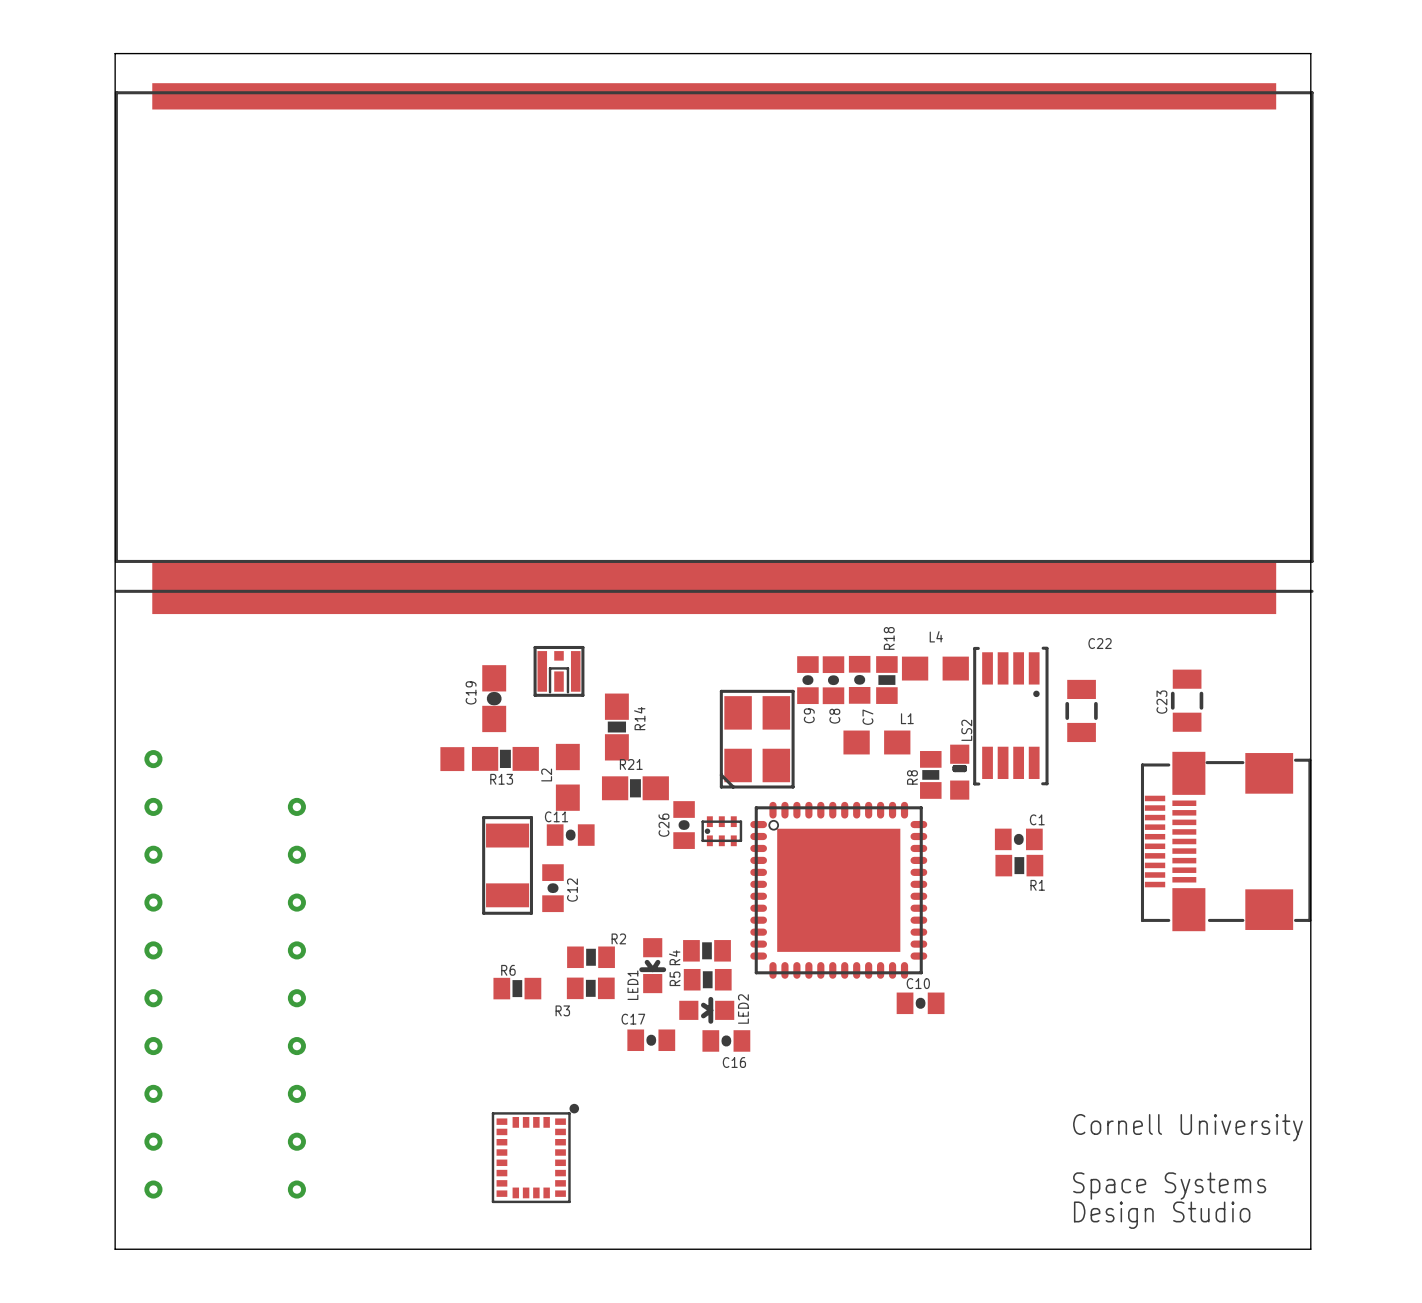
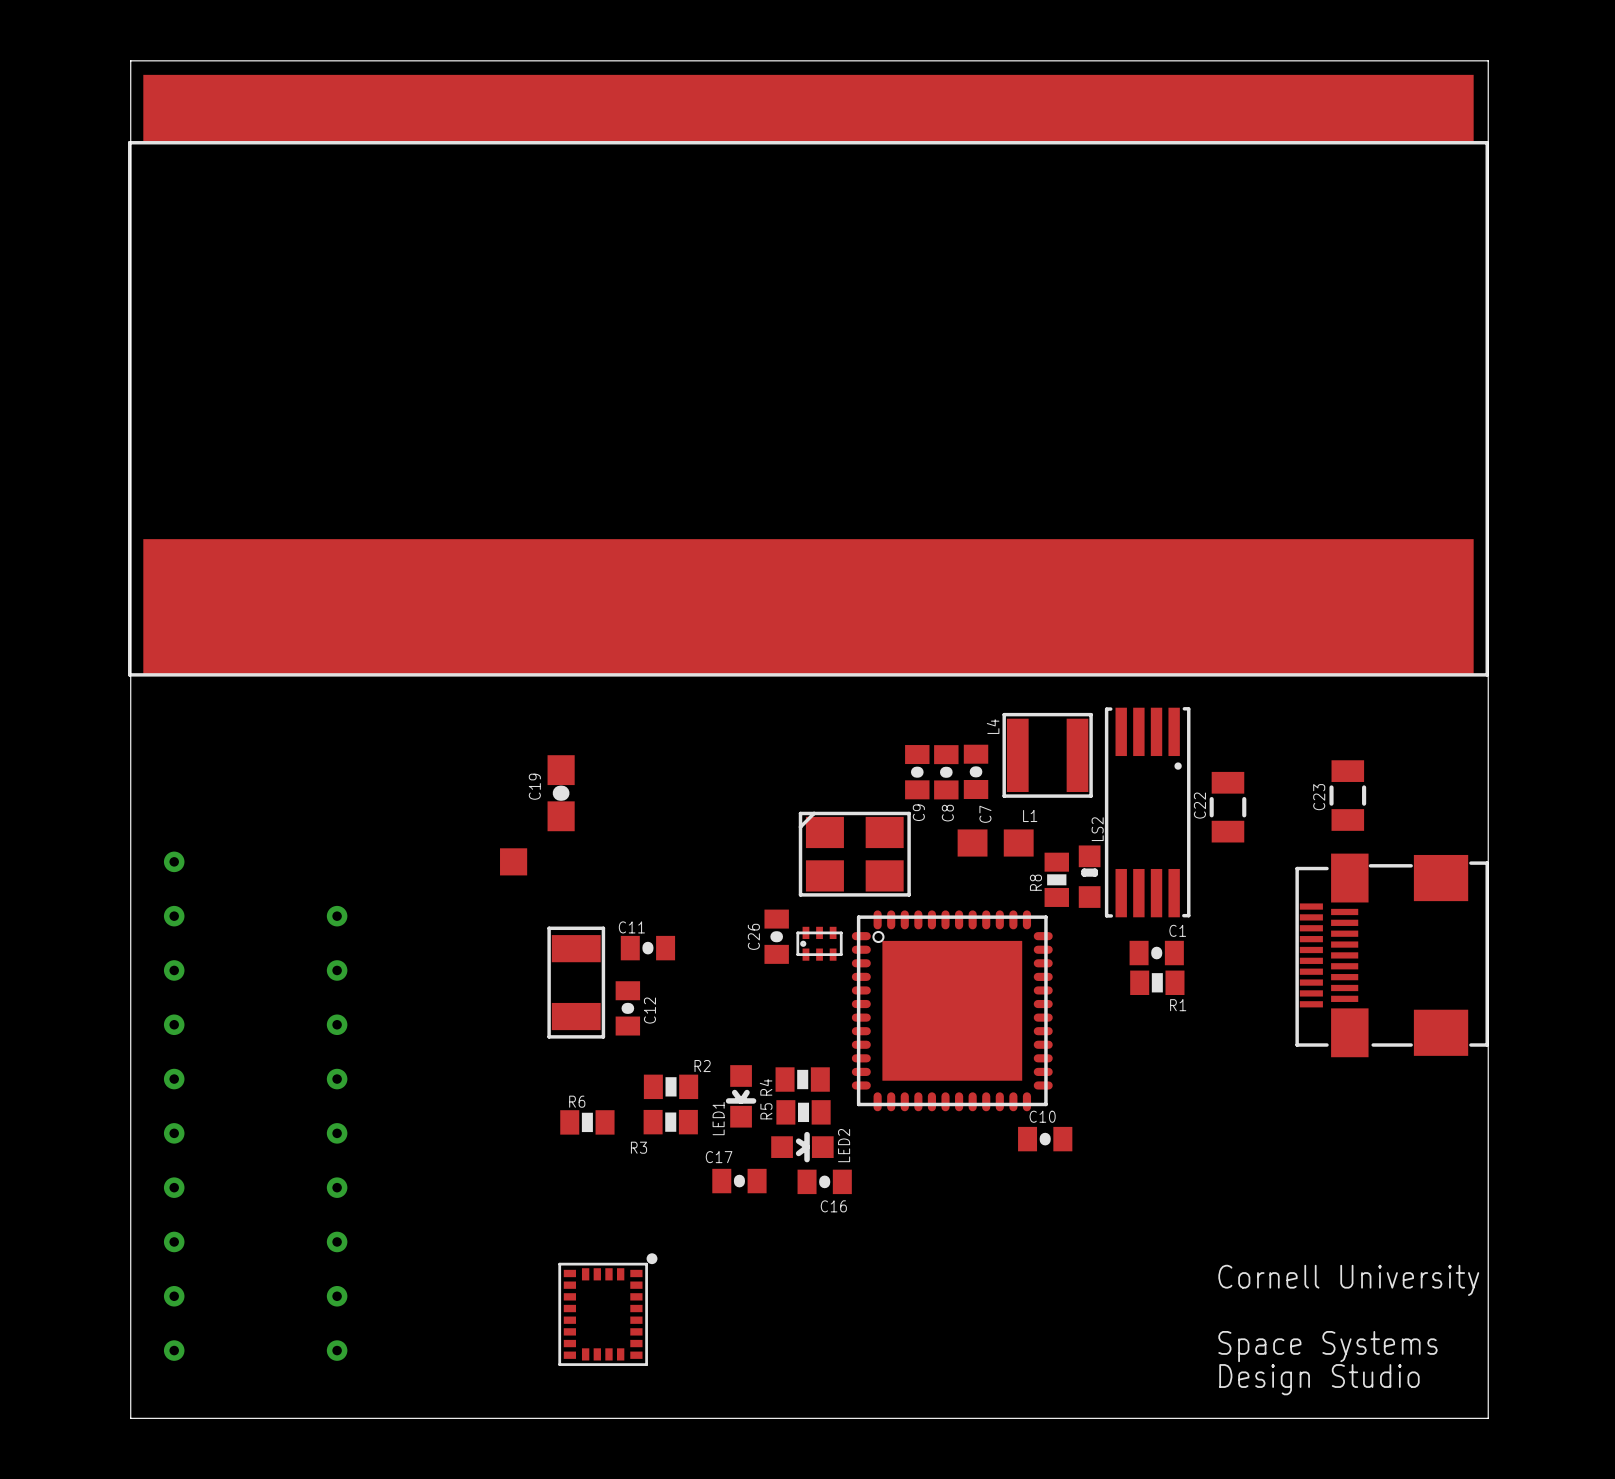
part footprint: [114, 83, 1314, 615] -> [128, 74, 1489, 677]
C22 name rotation: 0° (1100, 643) -> 90° counterclockwise (1199, 805)
C22 name position: C22 (1100, 643) -> C22 (1199, 805)
part footprint: [973, 646, 1049, 786] -> [1104, 707, 1191, 918]
L4 footprint: [901, 656, 969, 681] -> [1002, 712, 1093, 798]
part: (559, 671) -> none
R18: (886, 680) -> none
R14: (616, 727) -> none
part rotation: 0° (757, 739) -> 90° clockwise (854, 854)
R13: (505, 758) -> none
L2: (567, 777) -> none
R21: (635, 788) -> none

